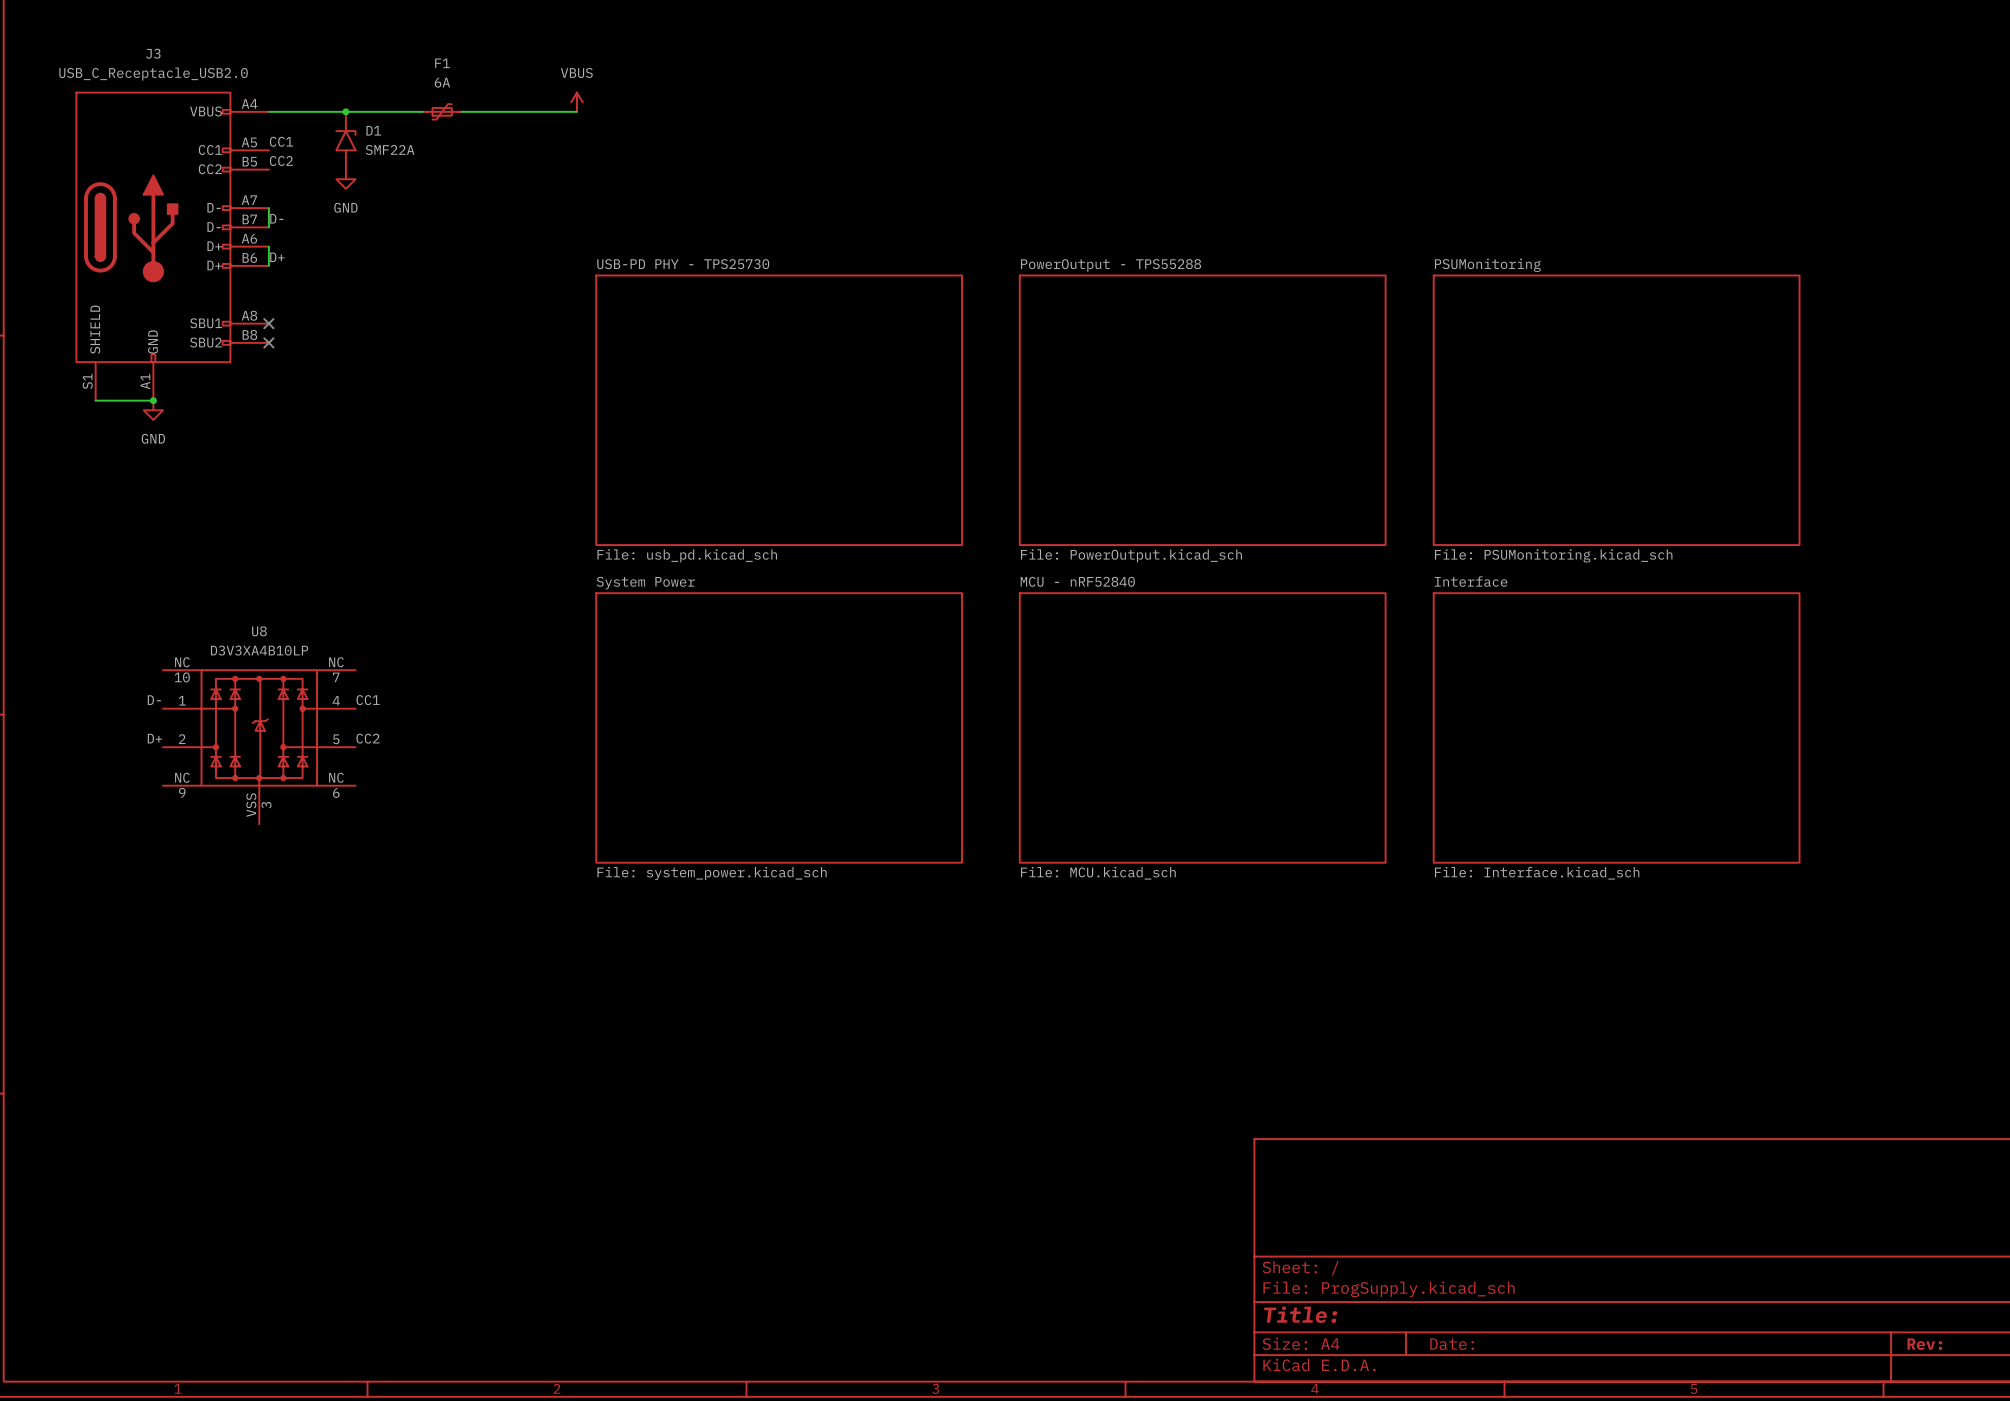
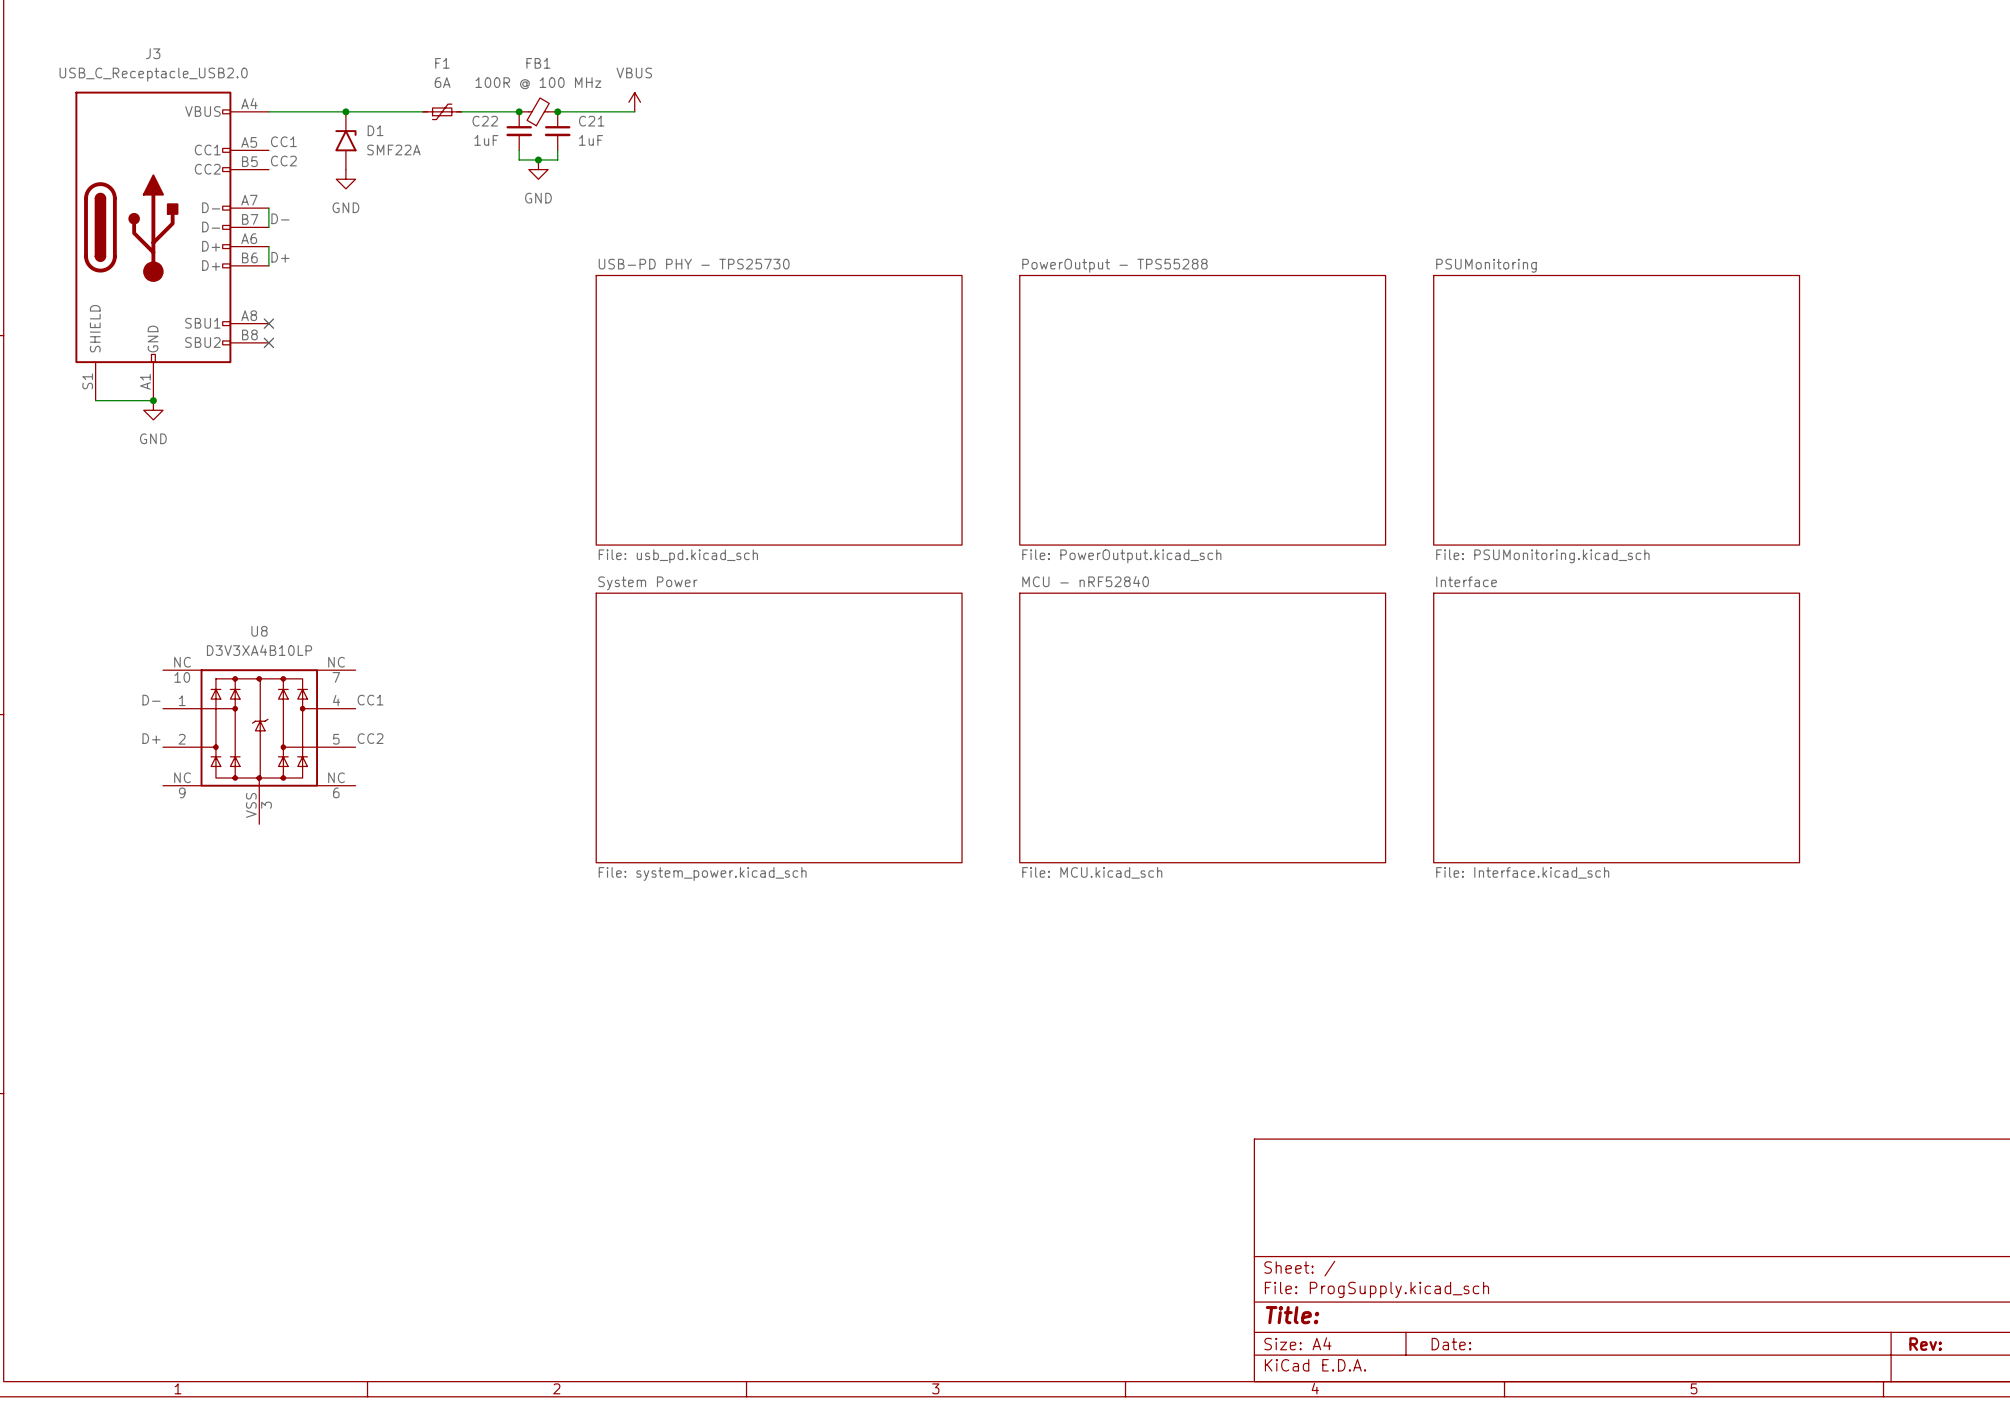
power symbol position: VBUS (576, 102) -> VBUS (634, 102)
junction: none -> (519, 111)
FB1: none -> 100R @ 100 MHz (538, 111)
junction: none -> (557, 111)
wire: none -> (576, 111) (634, 111)
C22: none -> 1uF (519, 131)
C21: none -> 1uF (557, 131)
wire: none -> (519, 150) (519, 159) (557, 159) (557, 150)
junction: none -> (538, 159)
power symbol: none -> GND (538, 169)

